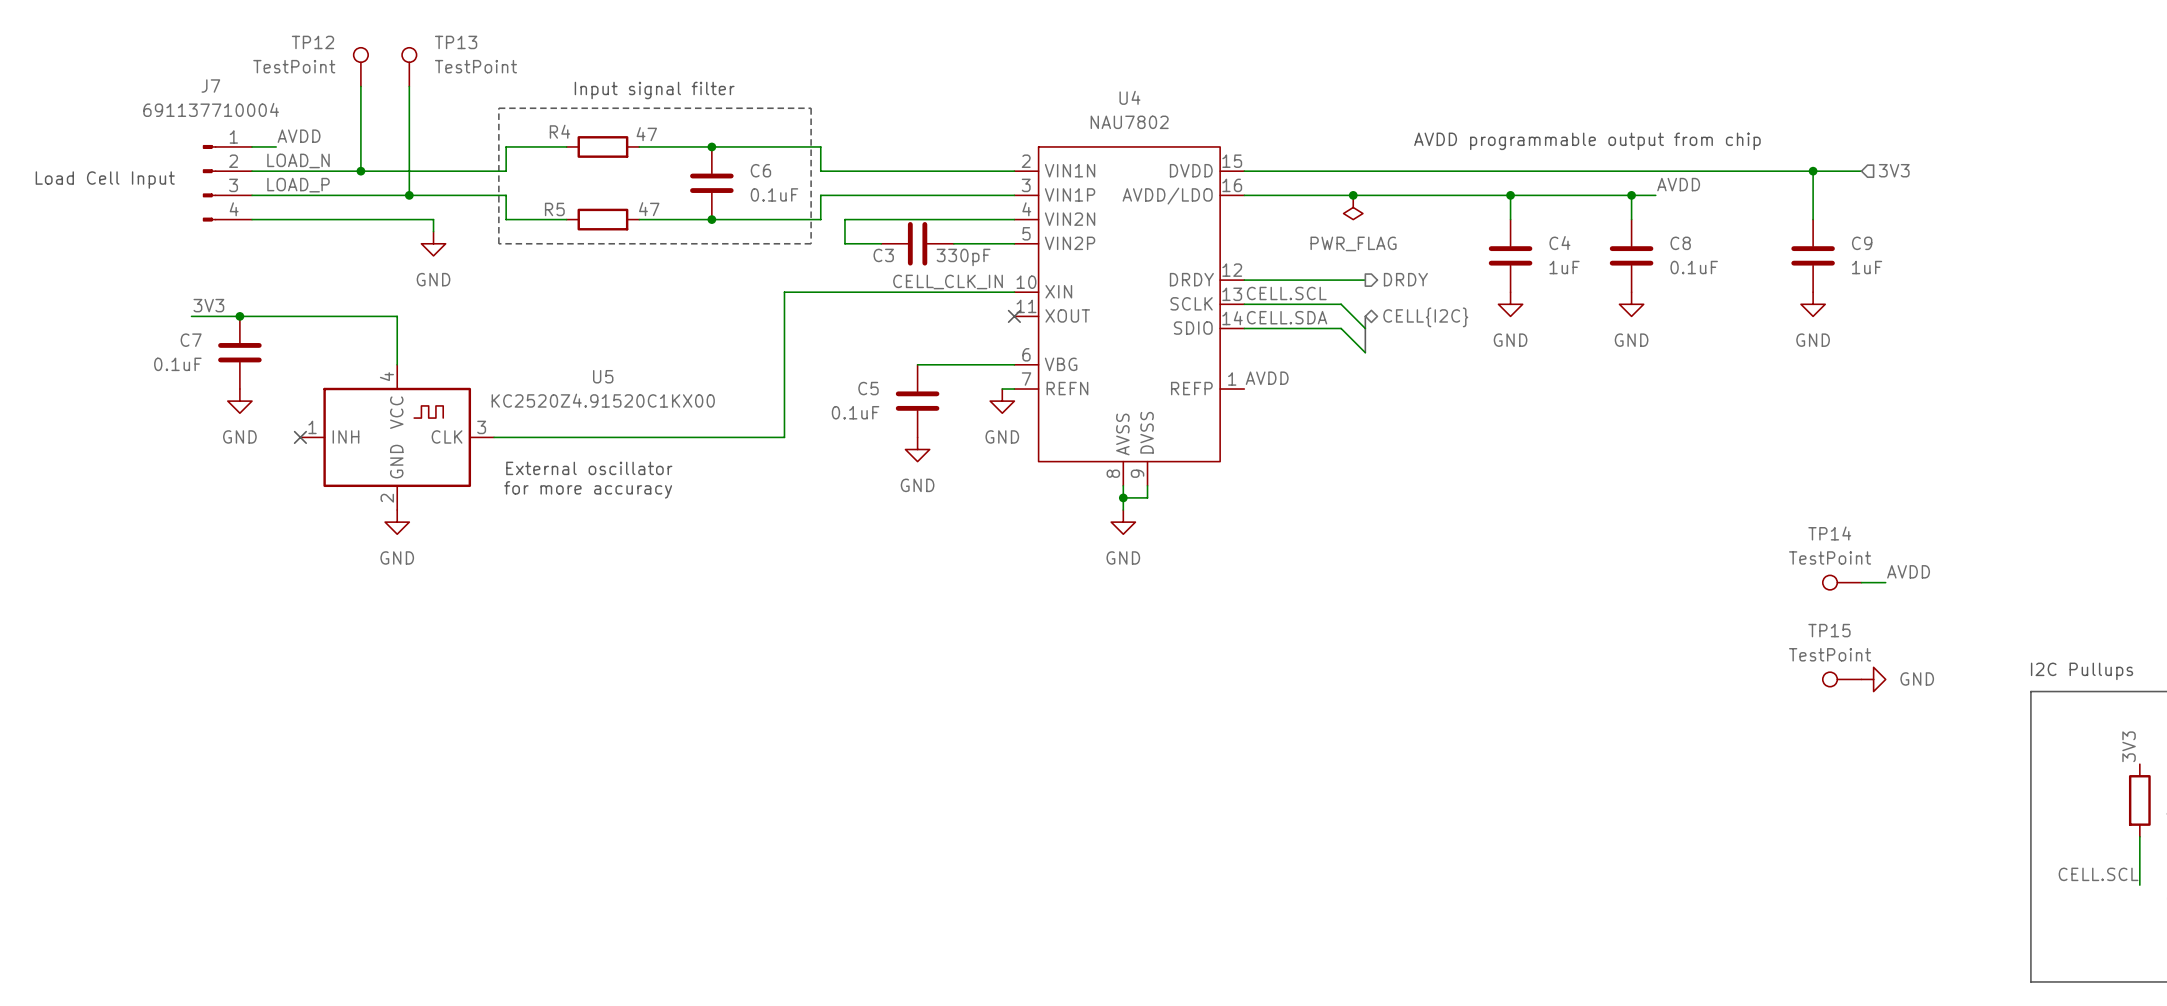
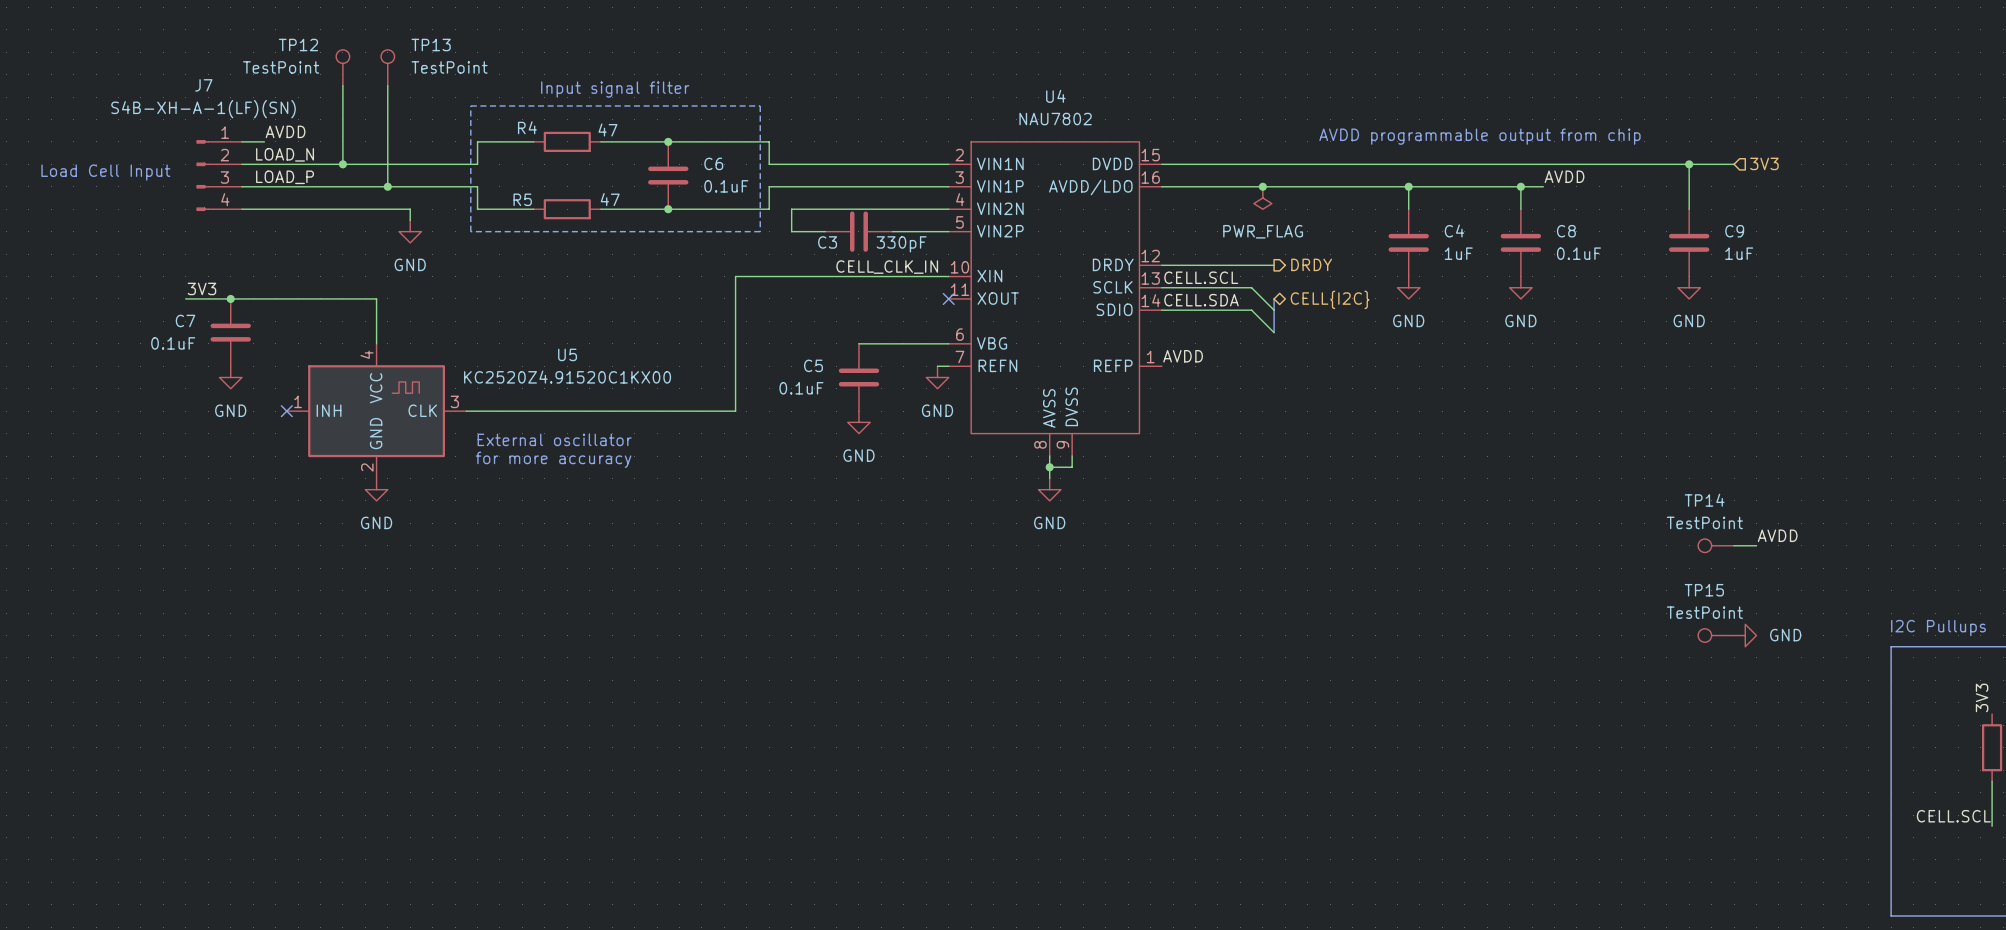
J7 value: 691137710004 (211, 109) -> S4B-XH-A-1(LF)(SN) (203, 109)

